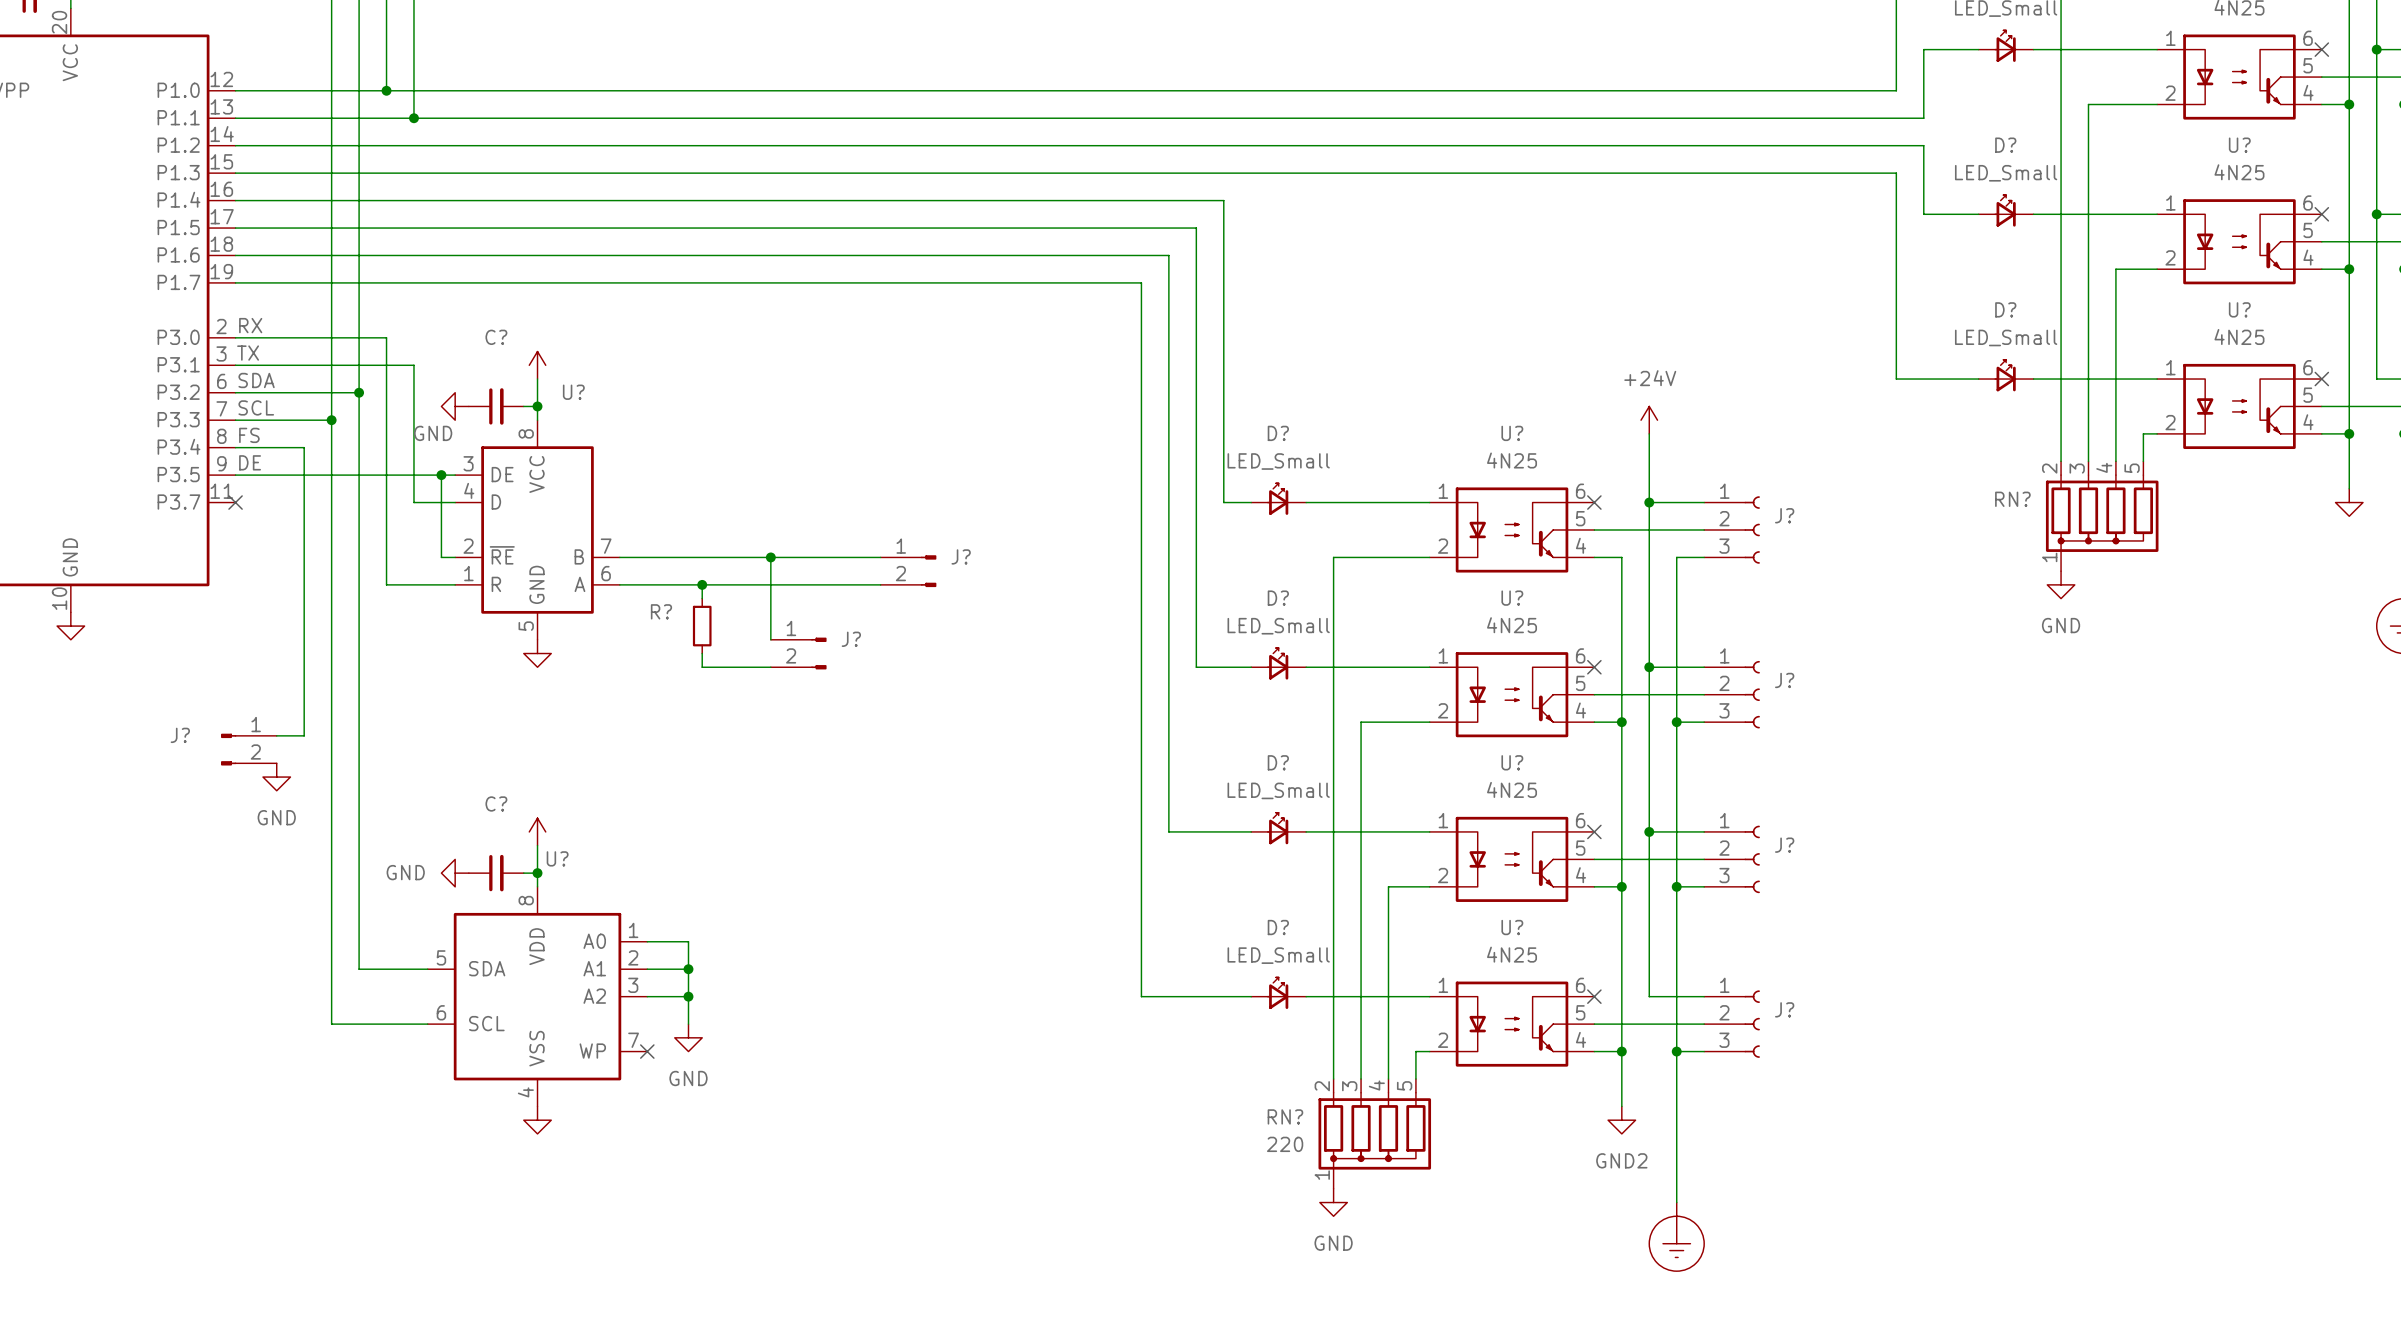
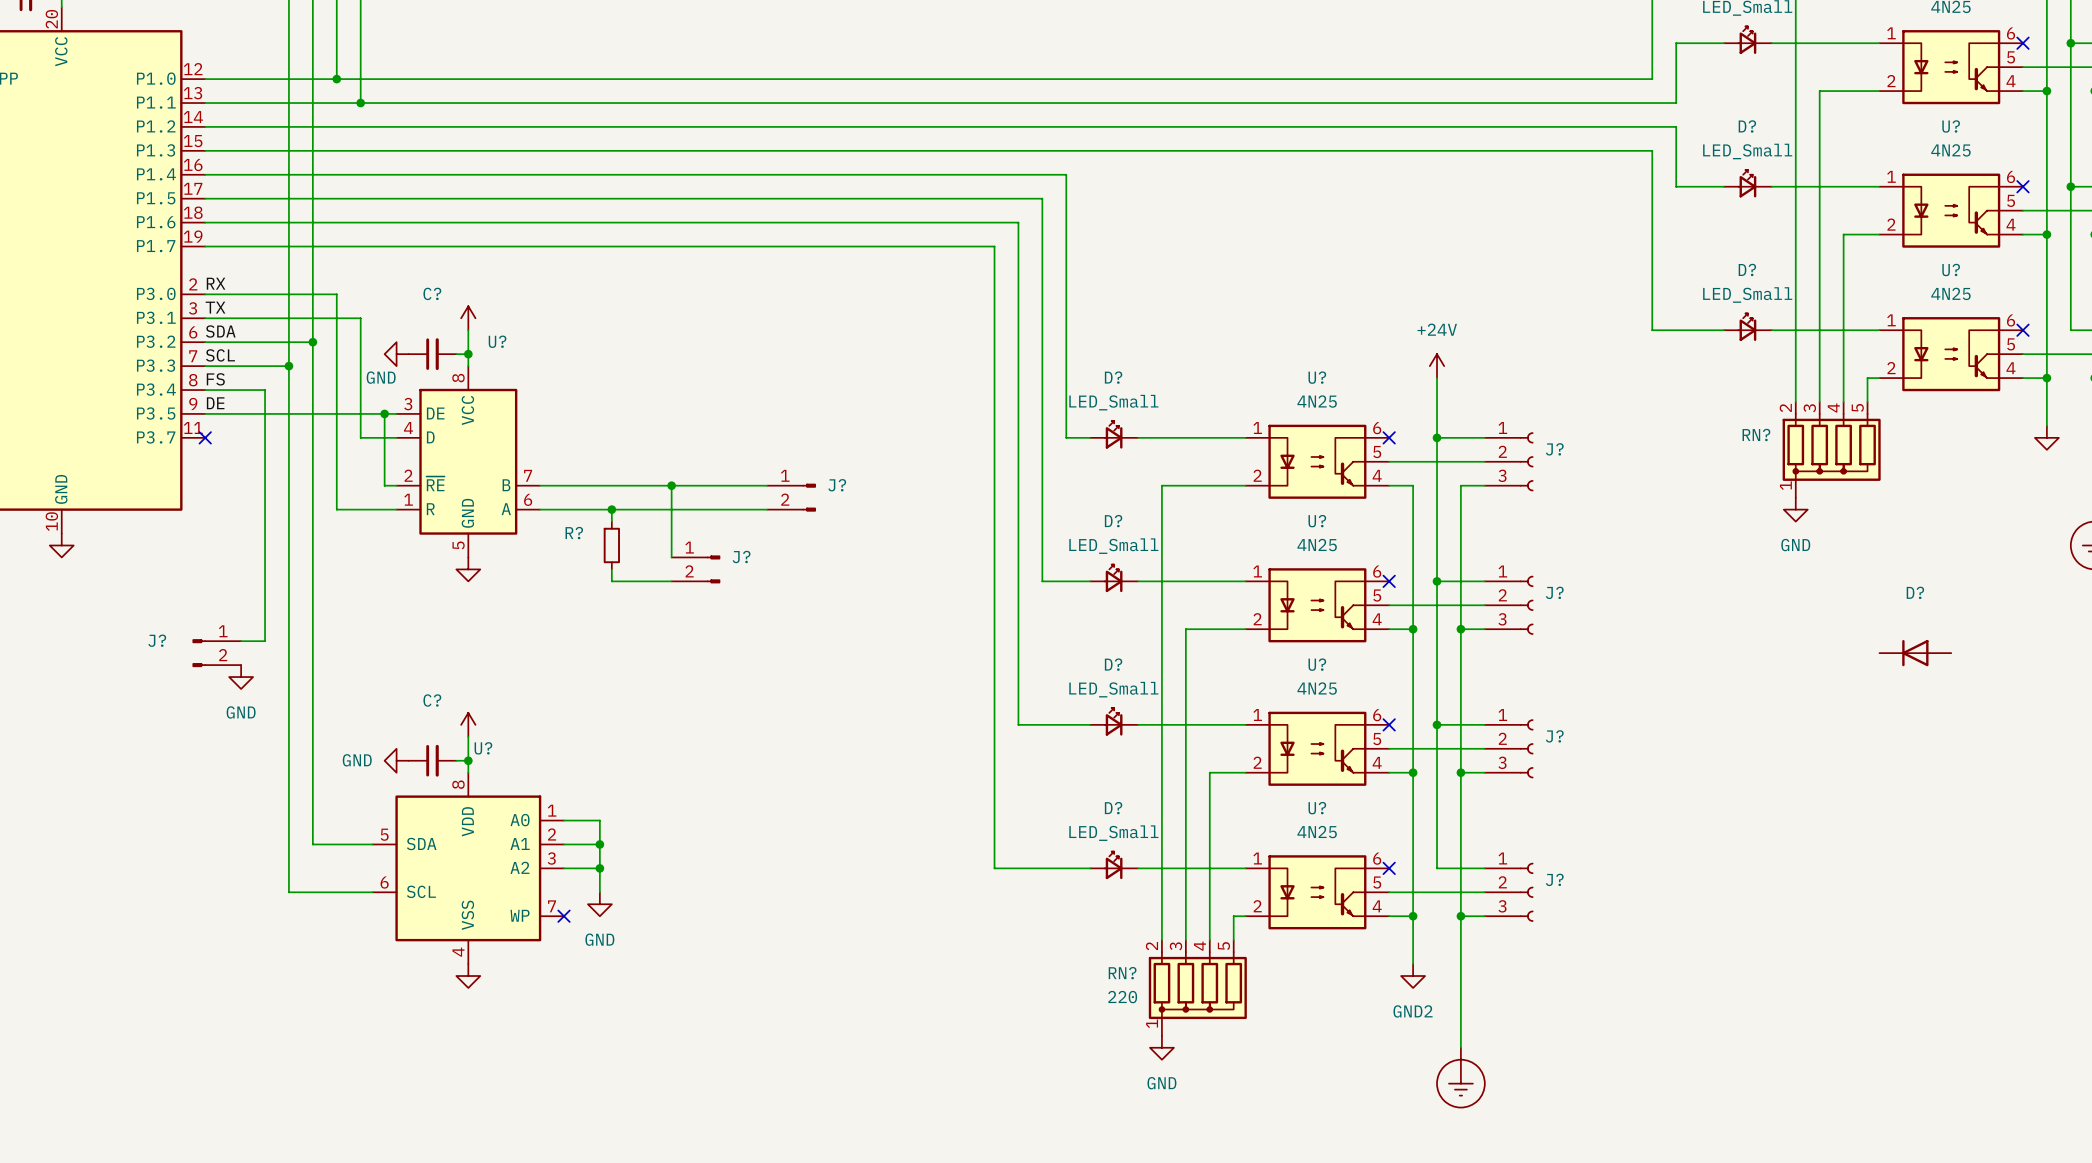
D?: none -> (1915, 653)

